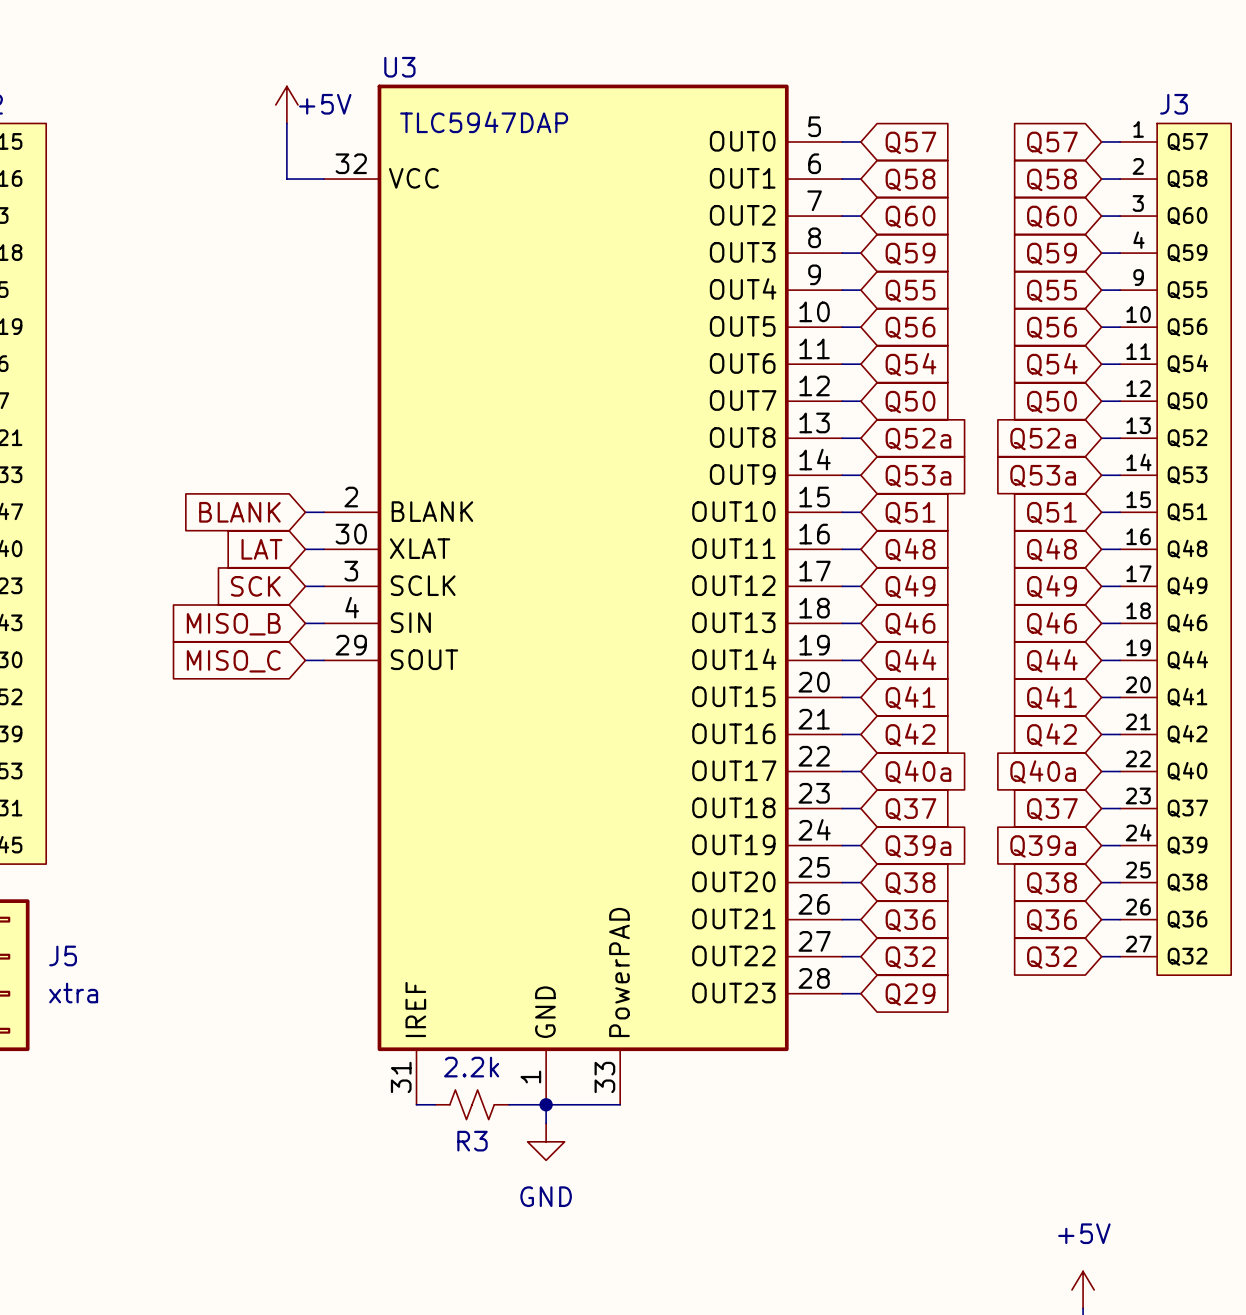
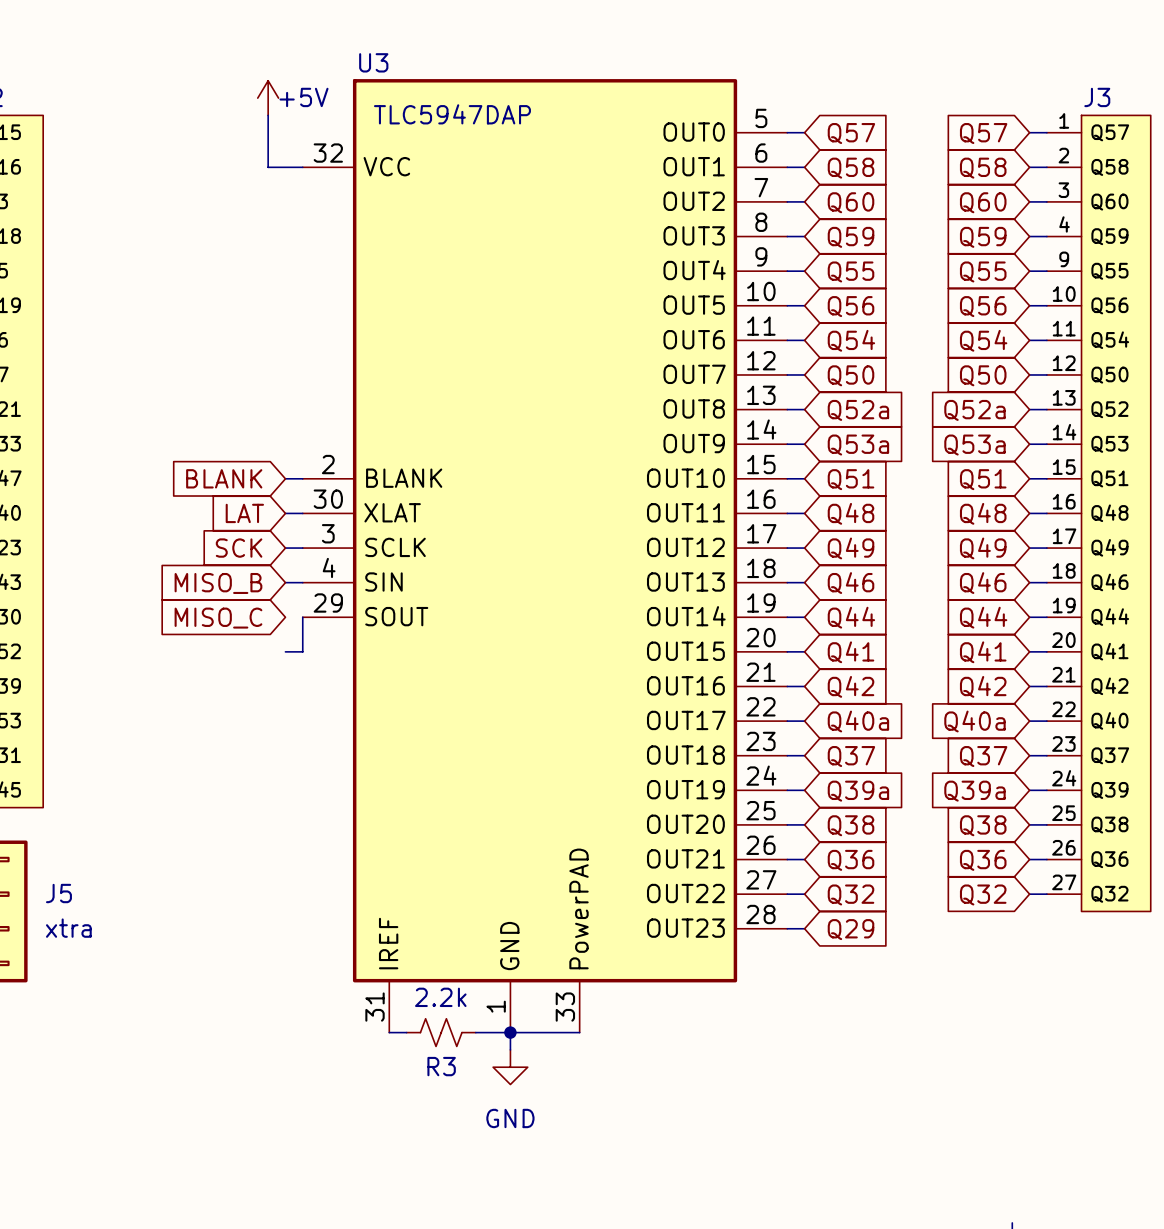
wire: (305, 660) (323, 660) -> (285, 651) (302, 651) (302, 617)
power symbol: +5V (1083, 1289) -> none

